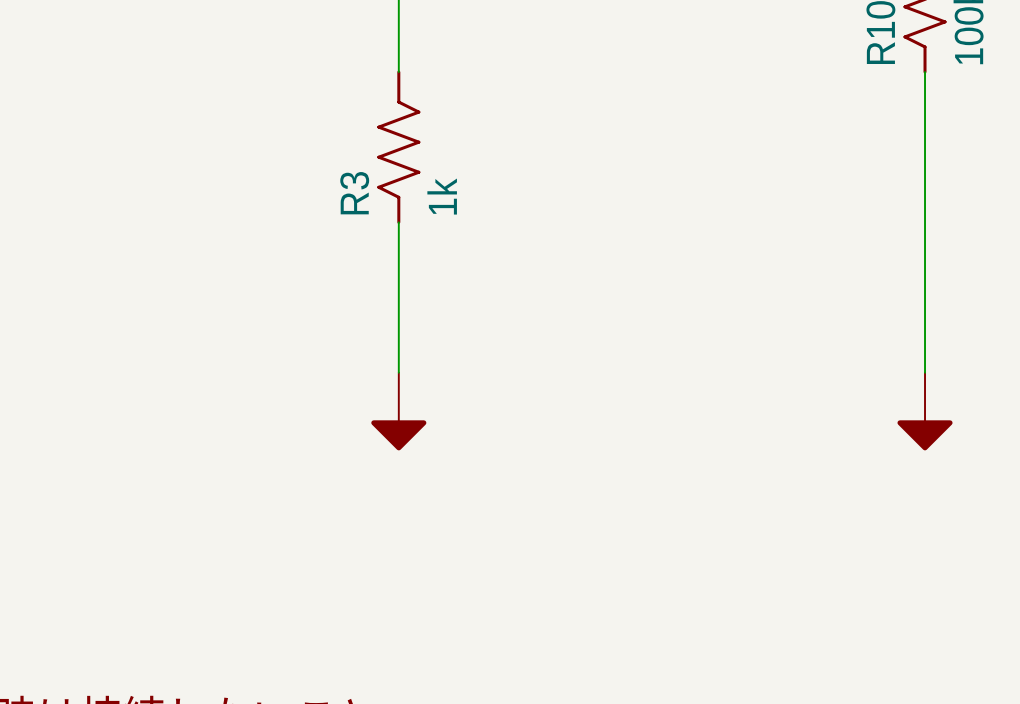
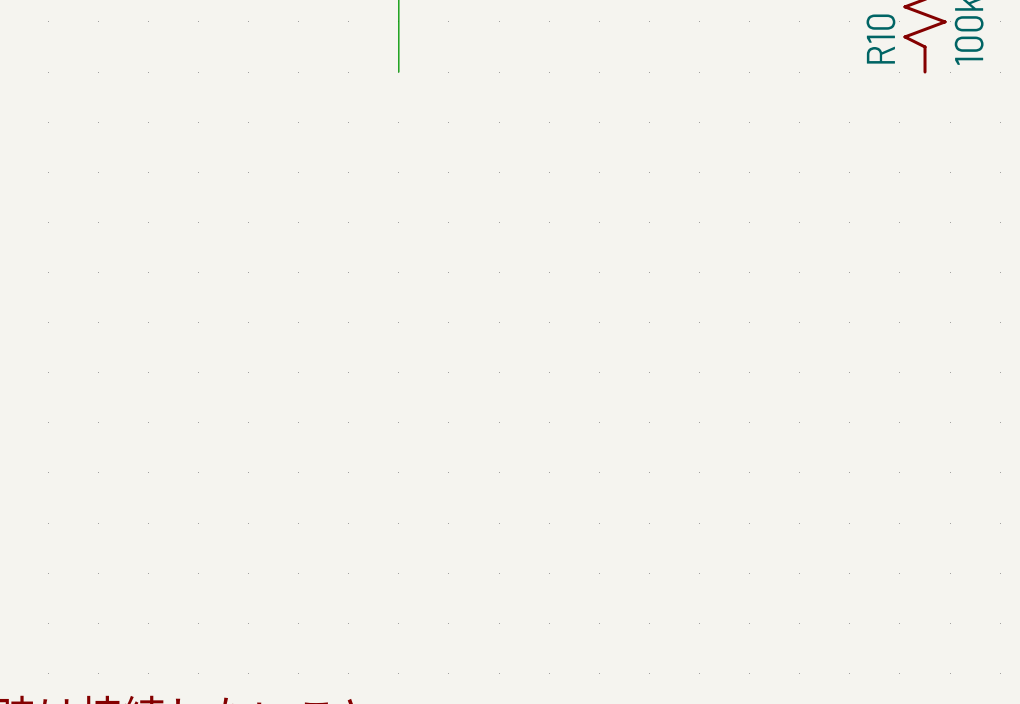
wire: (925, 72) (925, 372) -> none
R3: 1k (398, 147) -> none
wire: (398, 222) (398, 372) -> none
power symbol: (398, 411) -> none
power symbol: (925, 411) -> none

